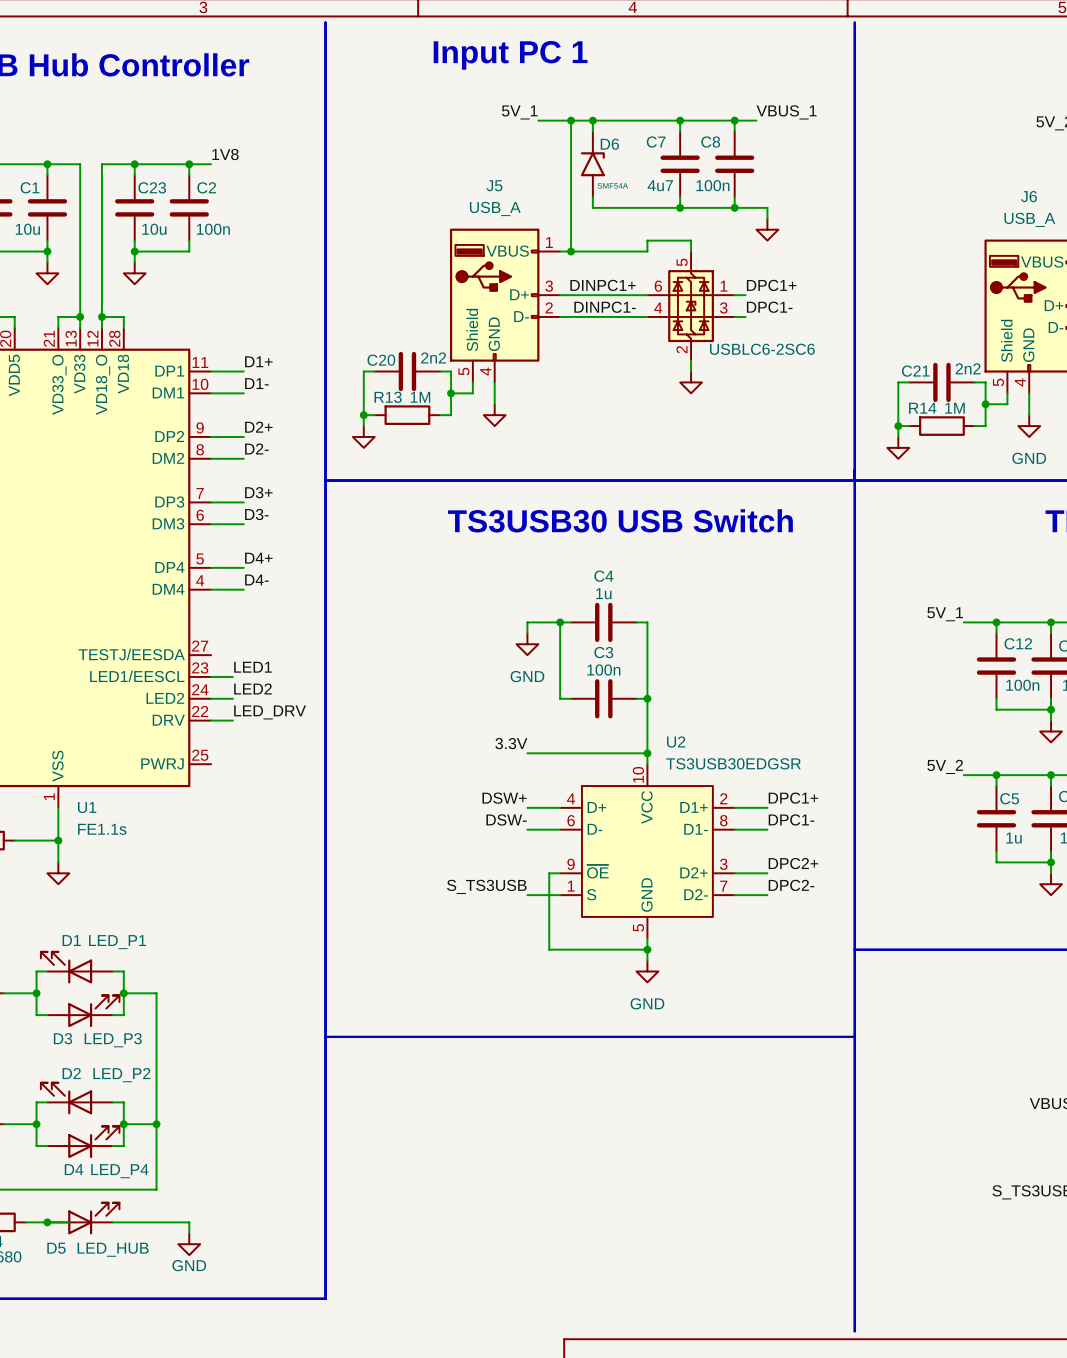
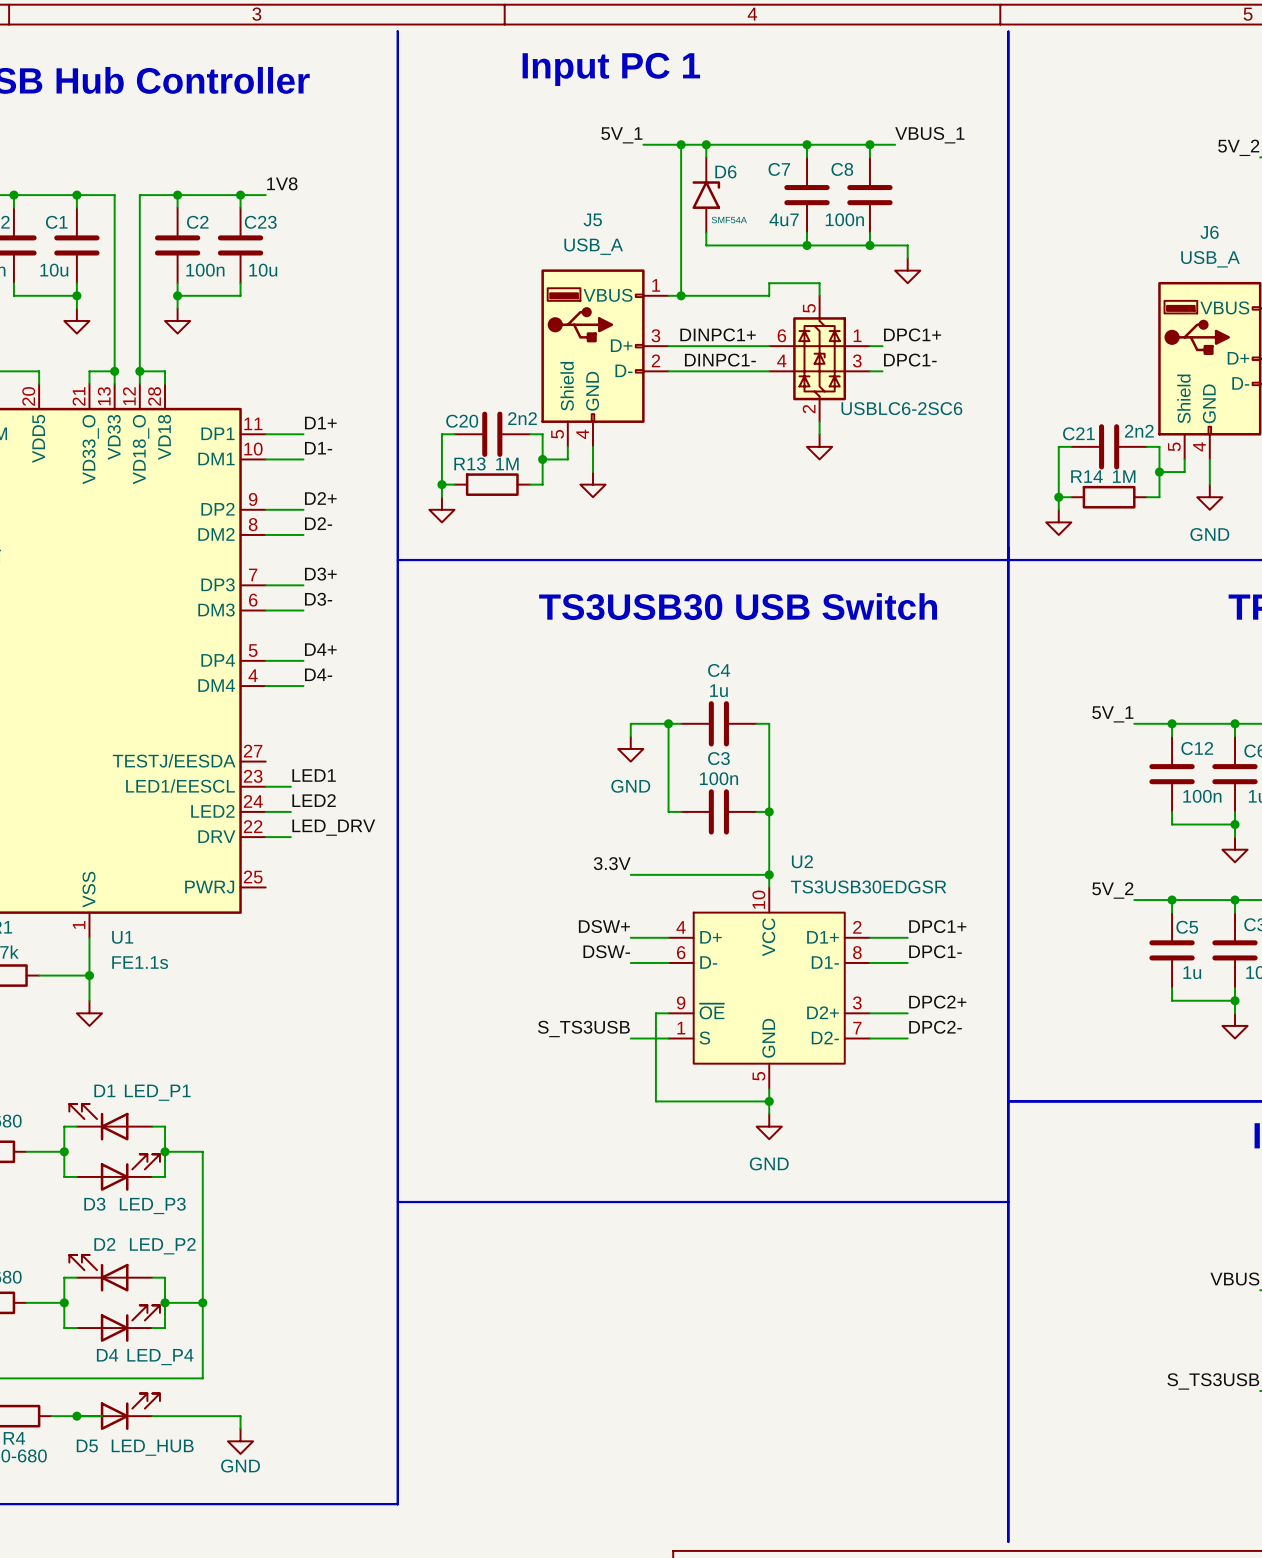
C23 name: C23 (152, 187) -> C2 (197, 222)
C2 name: C2 (206, 187) -> C23 (260, 222)
C23 value: 10u (154, 229) -> 100n (205, 270)
C2 value: 100n (213, 229) -> 10u (263, 270)

